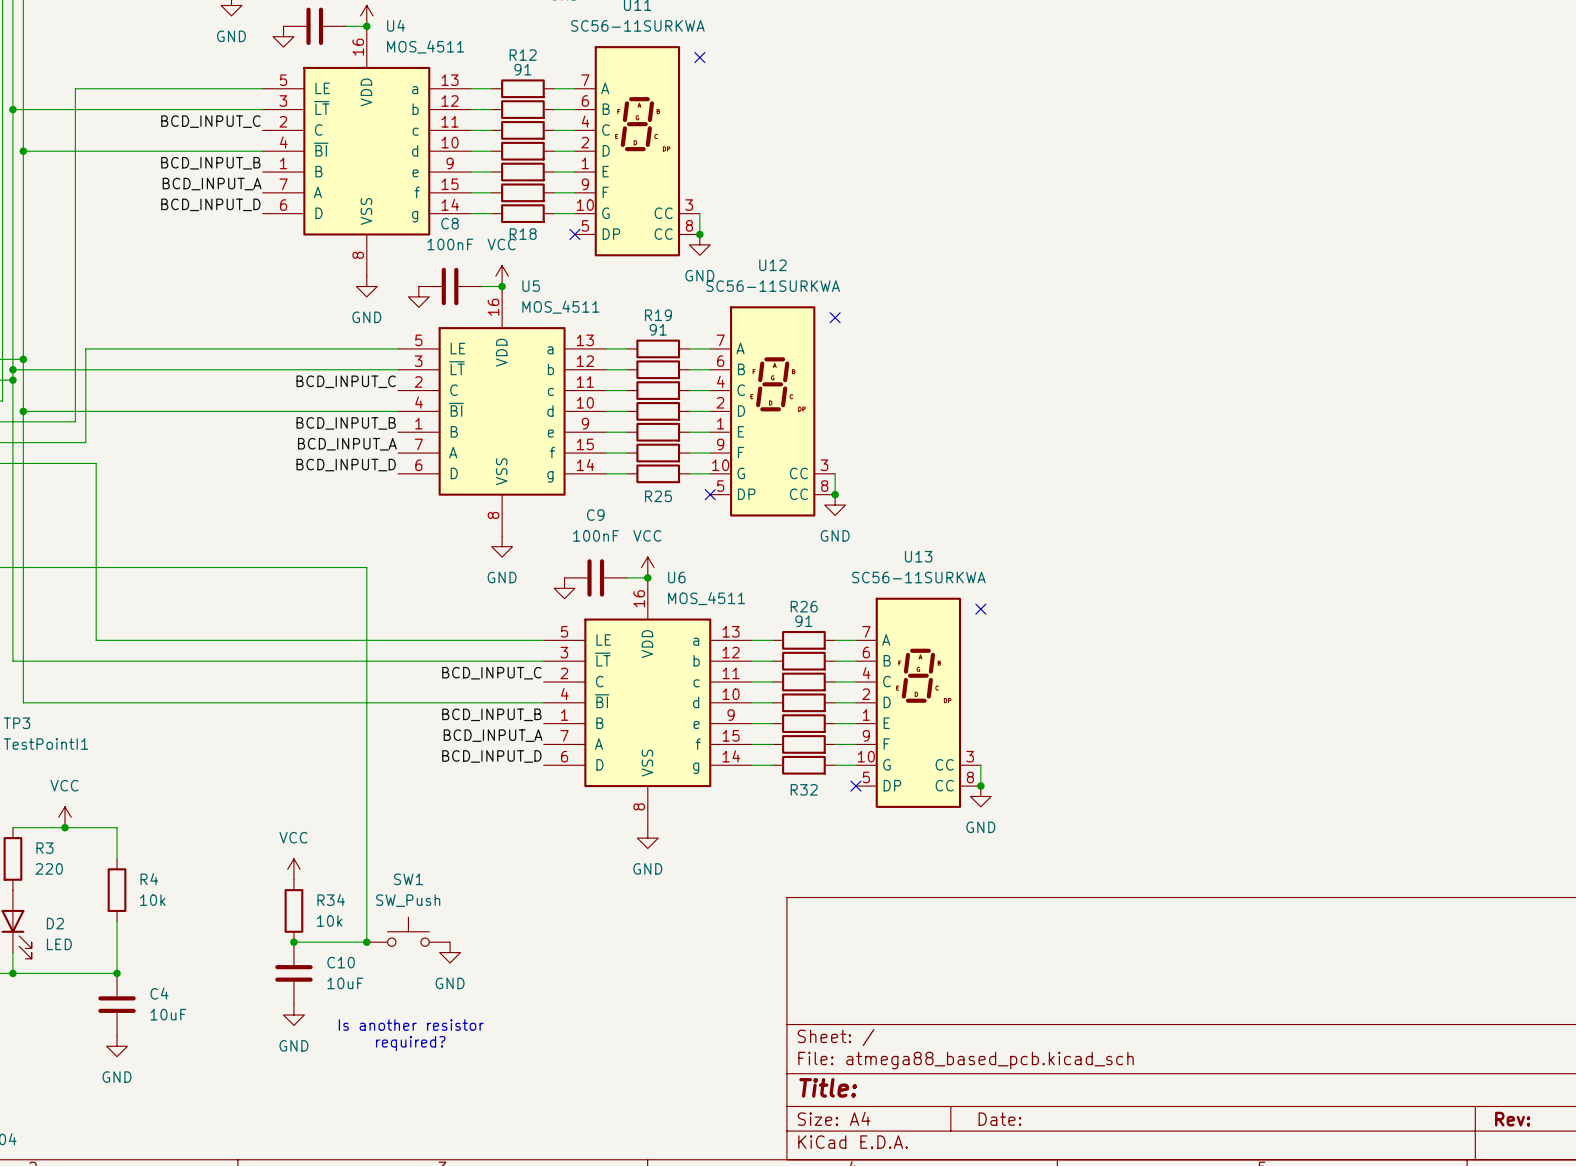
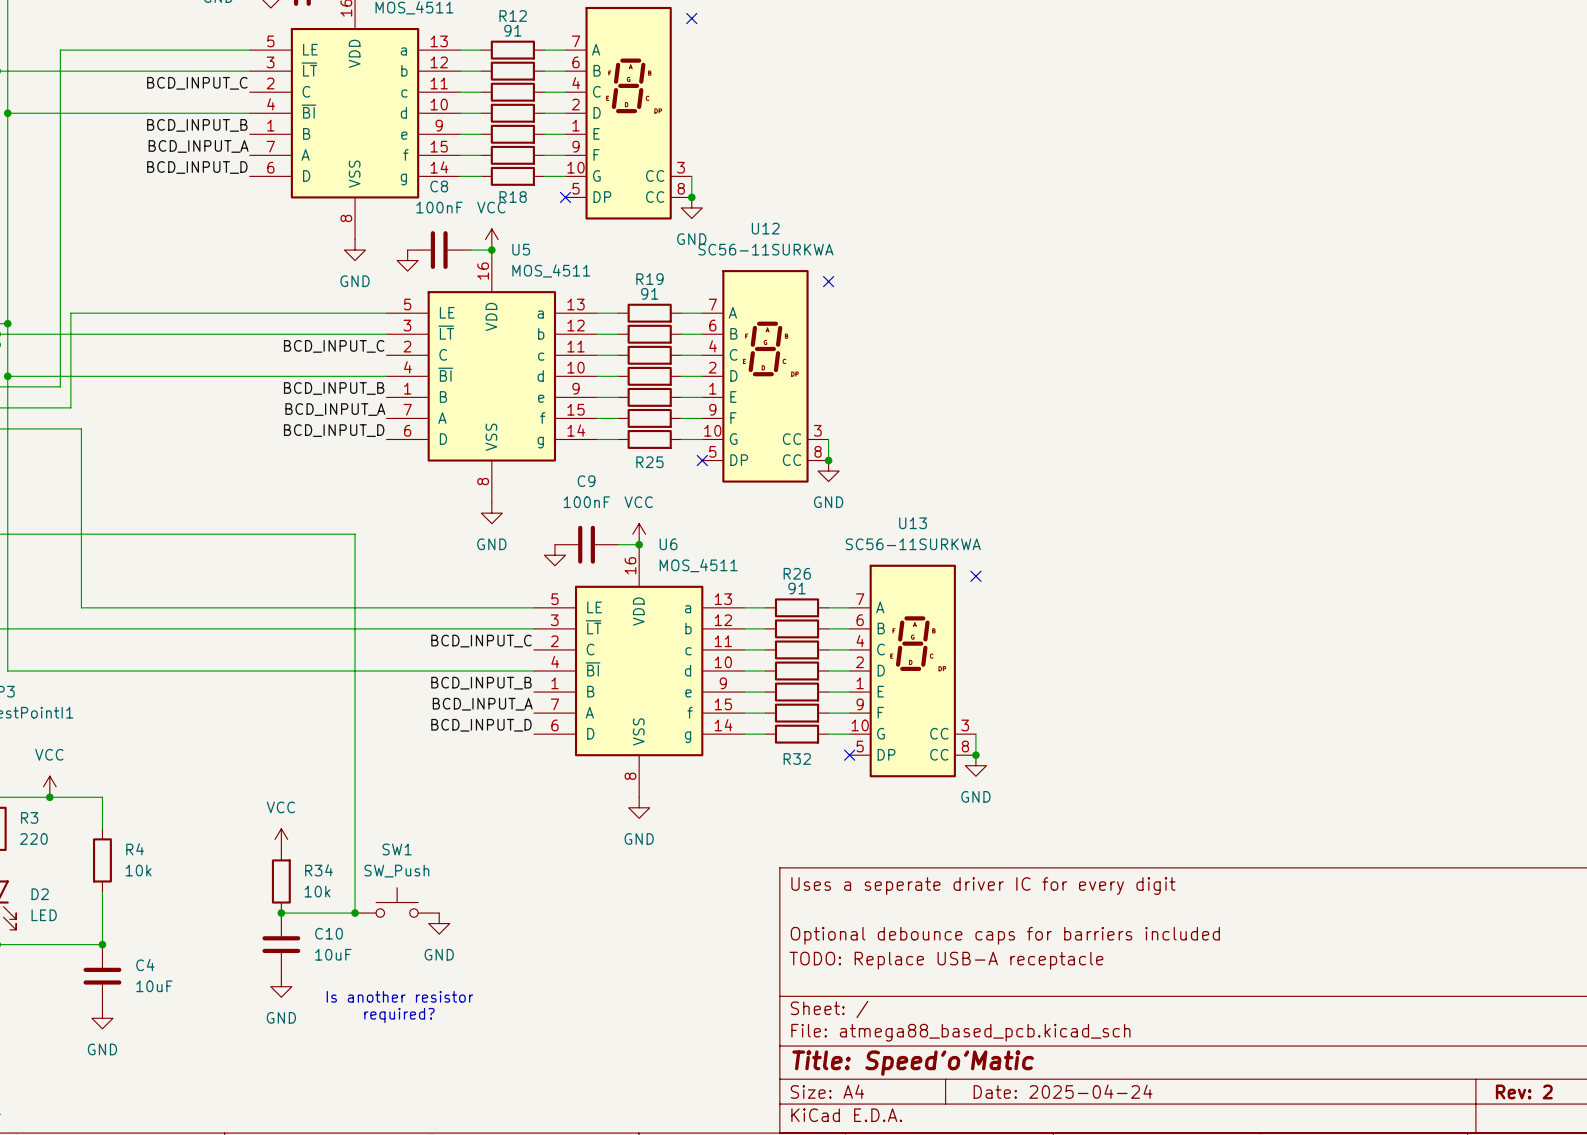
title block: none -> Uses a seperate driver IC for every digit (983, 886)
title block: none -> Optional debounce caps for barriers included (1005, 935)
title block: none -> TODO: Replace USB-A receptacle (946, 960)
title block: Title: (828, 1087) -> Title: Speed'o'Matic (913, 1063)
title block: Date: (999, 1119) -> Date: 2025-04-24 (1063, 1091)
title block: Rev: (1512, 1119) -> Rev: 2 (1524, 1091)

